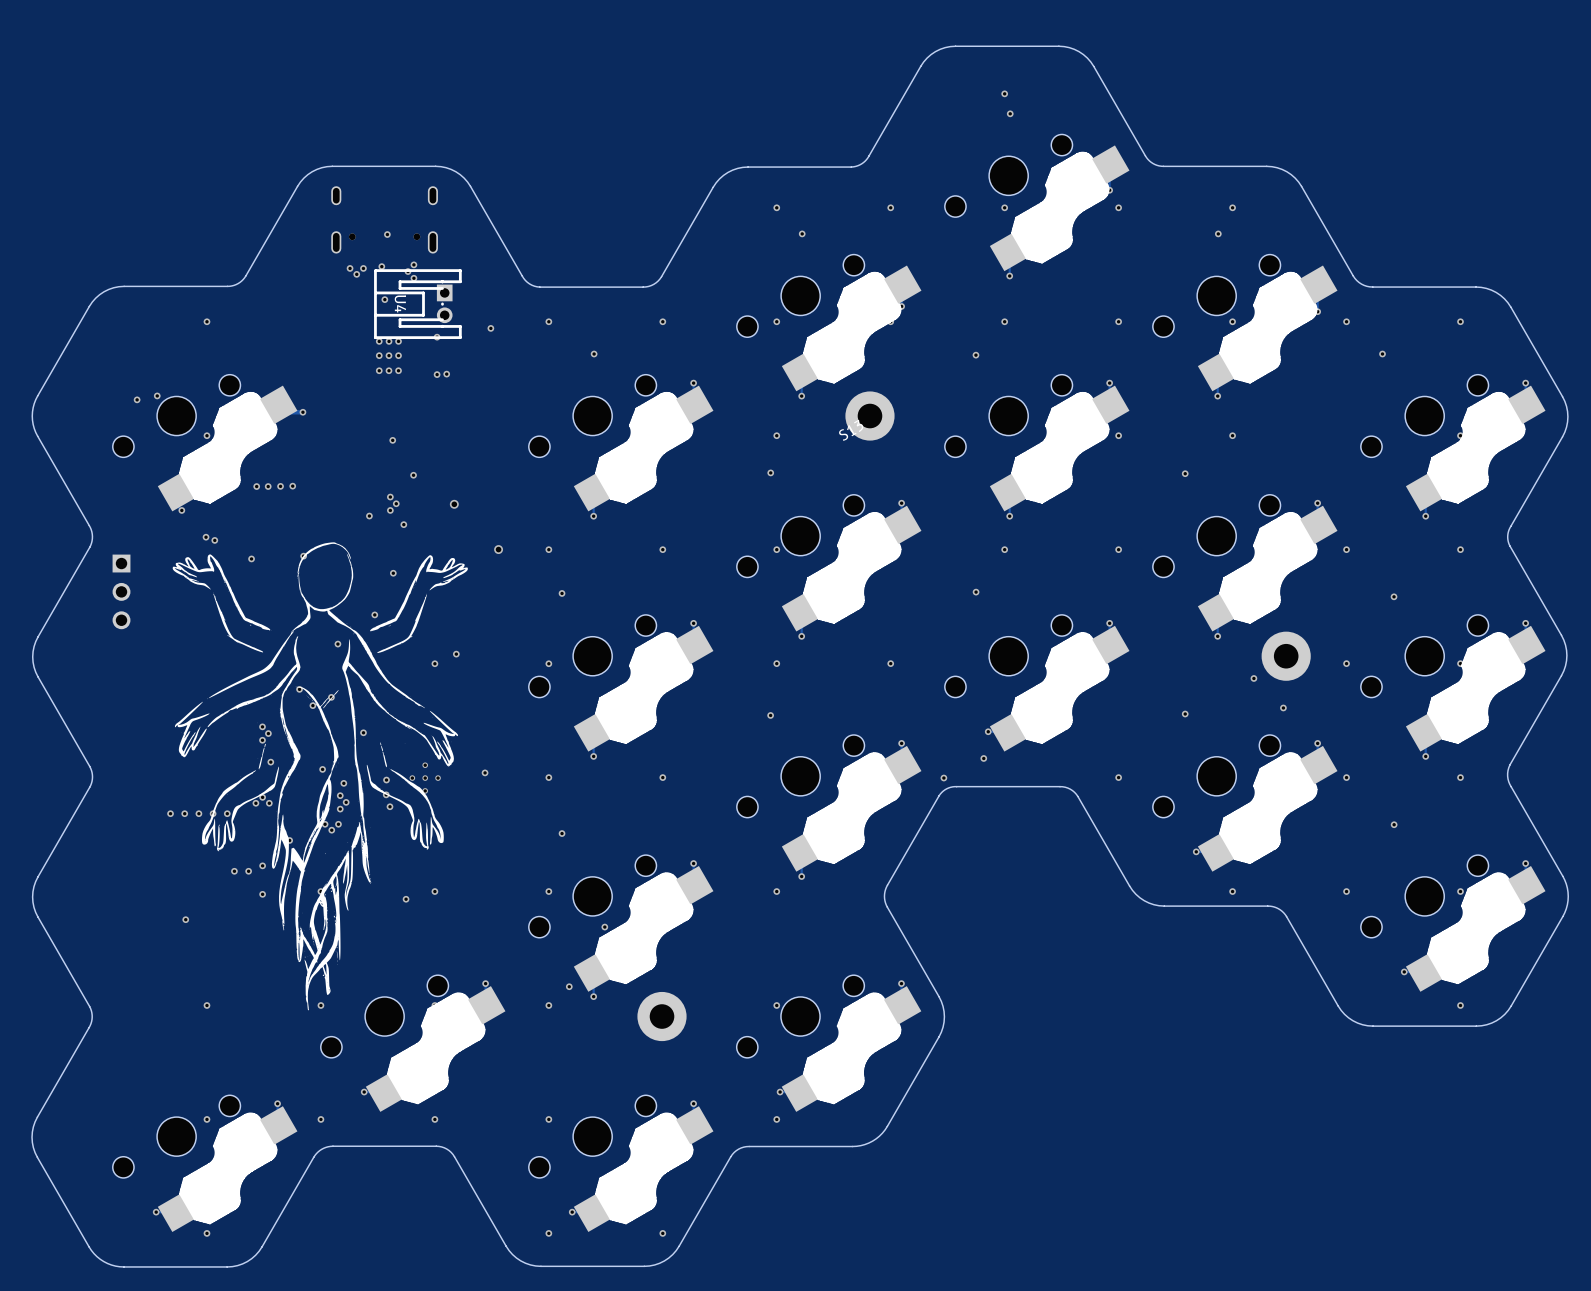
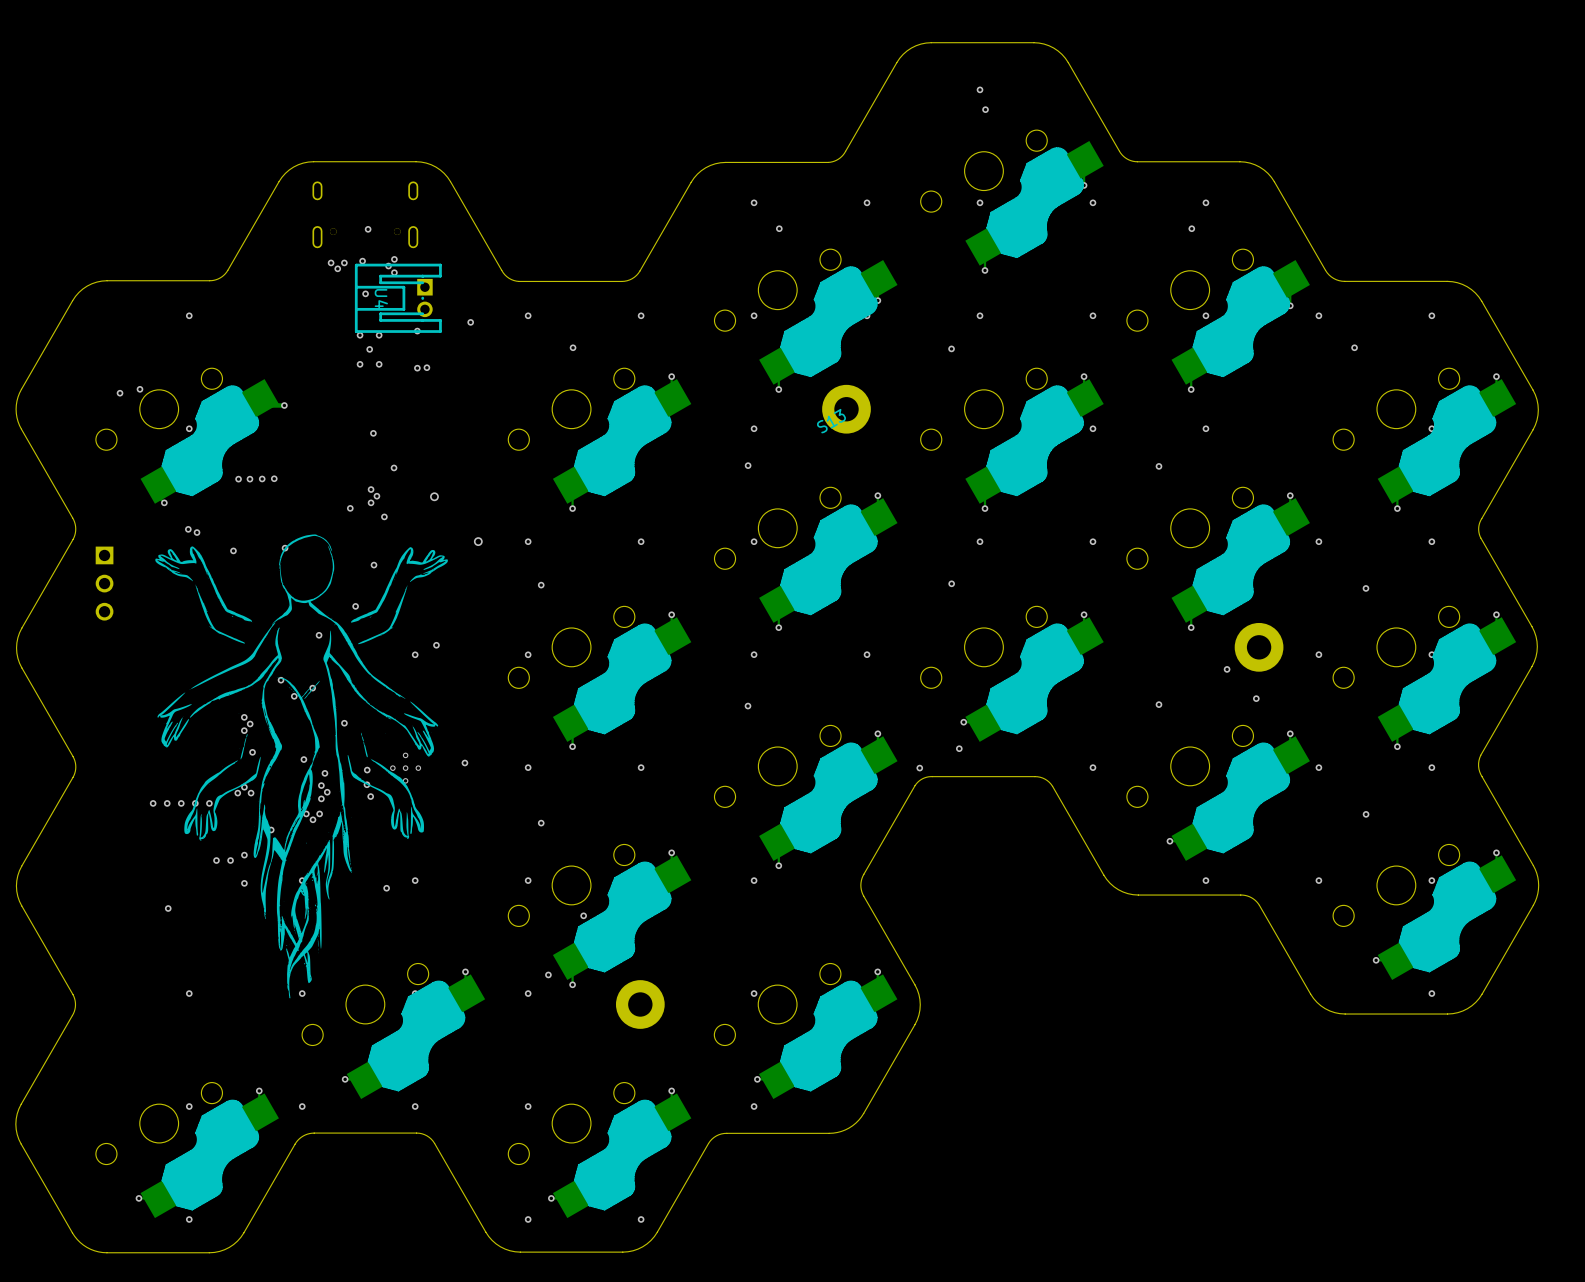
via: (389, 341) -> none
via: (379, 355) -> none
via: (398, 355) -> none
via: (388, 370) -> none

